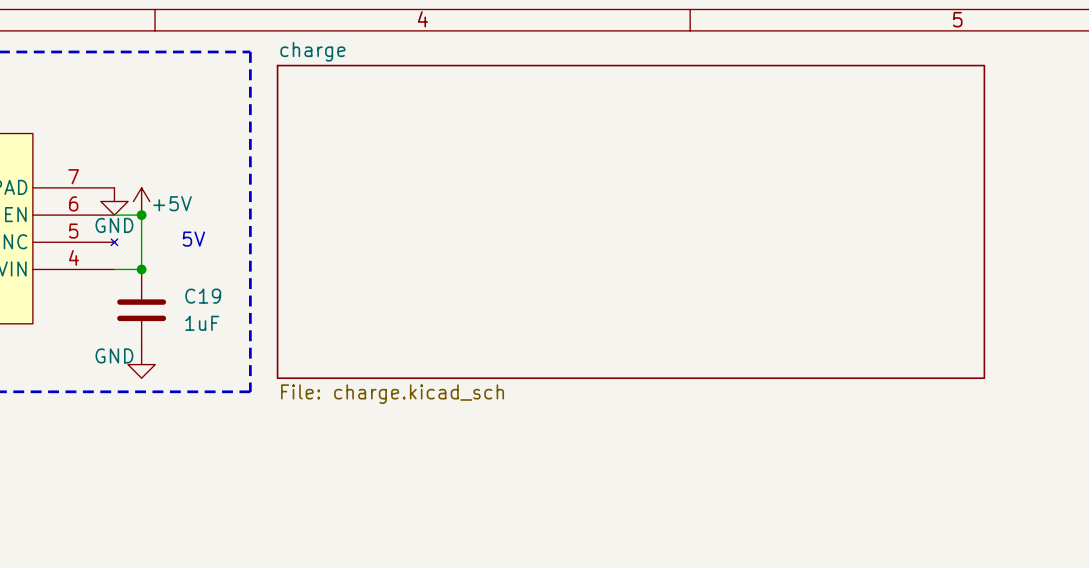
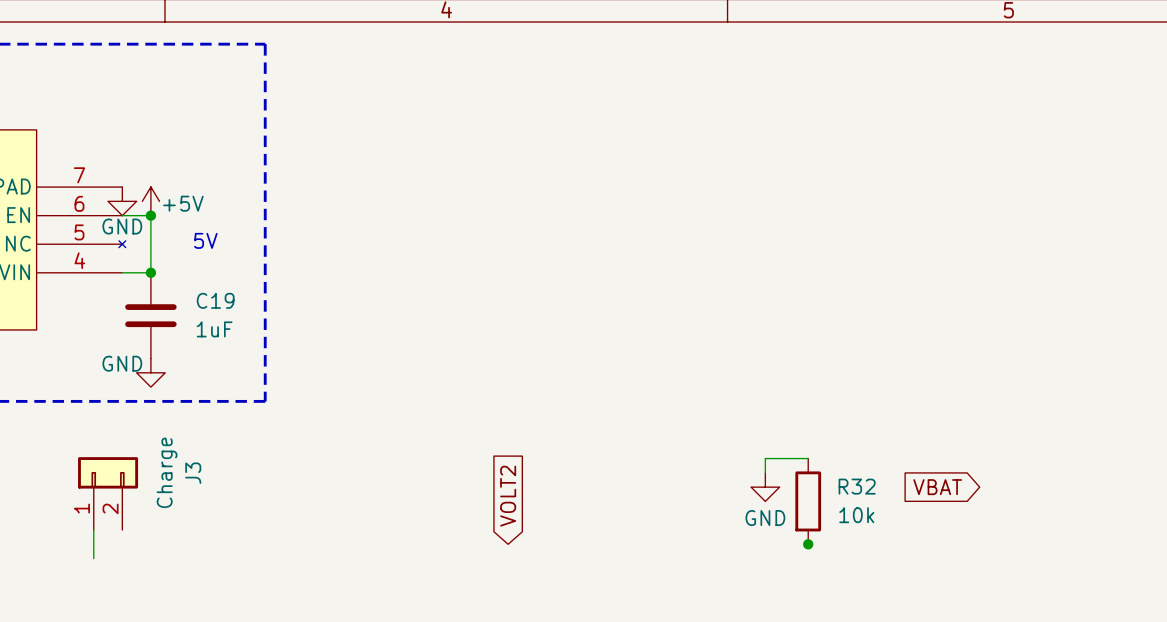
sheet charge: File: charge.kicad_sch (630, 221) -> none
wire: none -> (808, 458) (765, 458) (765, 472)
power symbol: none -> GND (765, 487)
global label: none -> VBAT (937, 487)
J3: none -> Charge (108, 493)
global label: none -> VOLT2 (508, 496)
R32: none -> 10k (808, 501)
wire: none -> (93, 530) (93, 558)
junction: none -> (808, 544)

